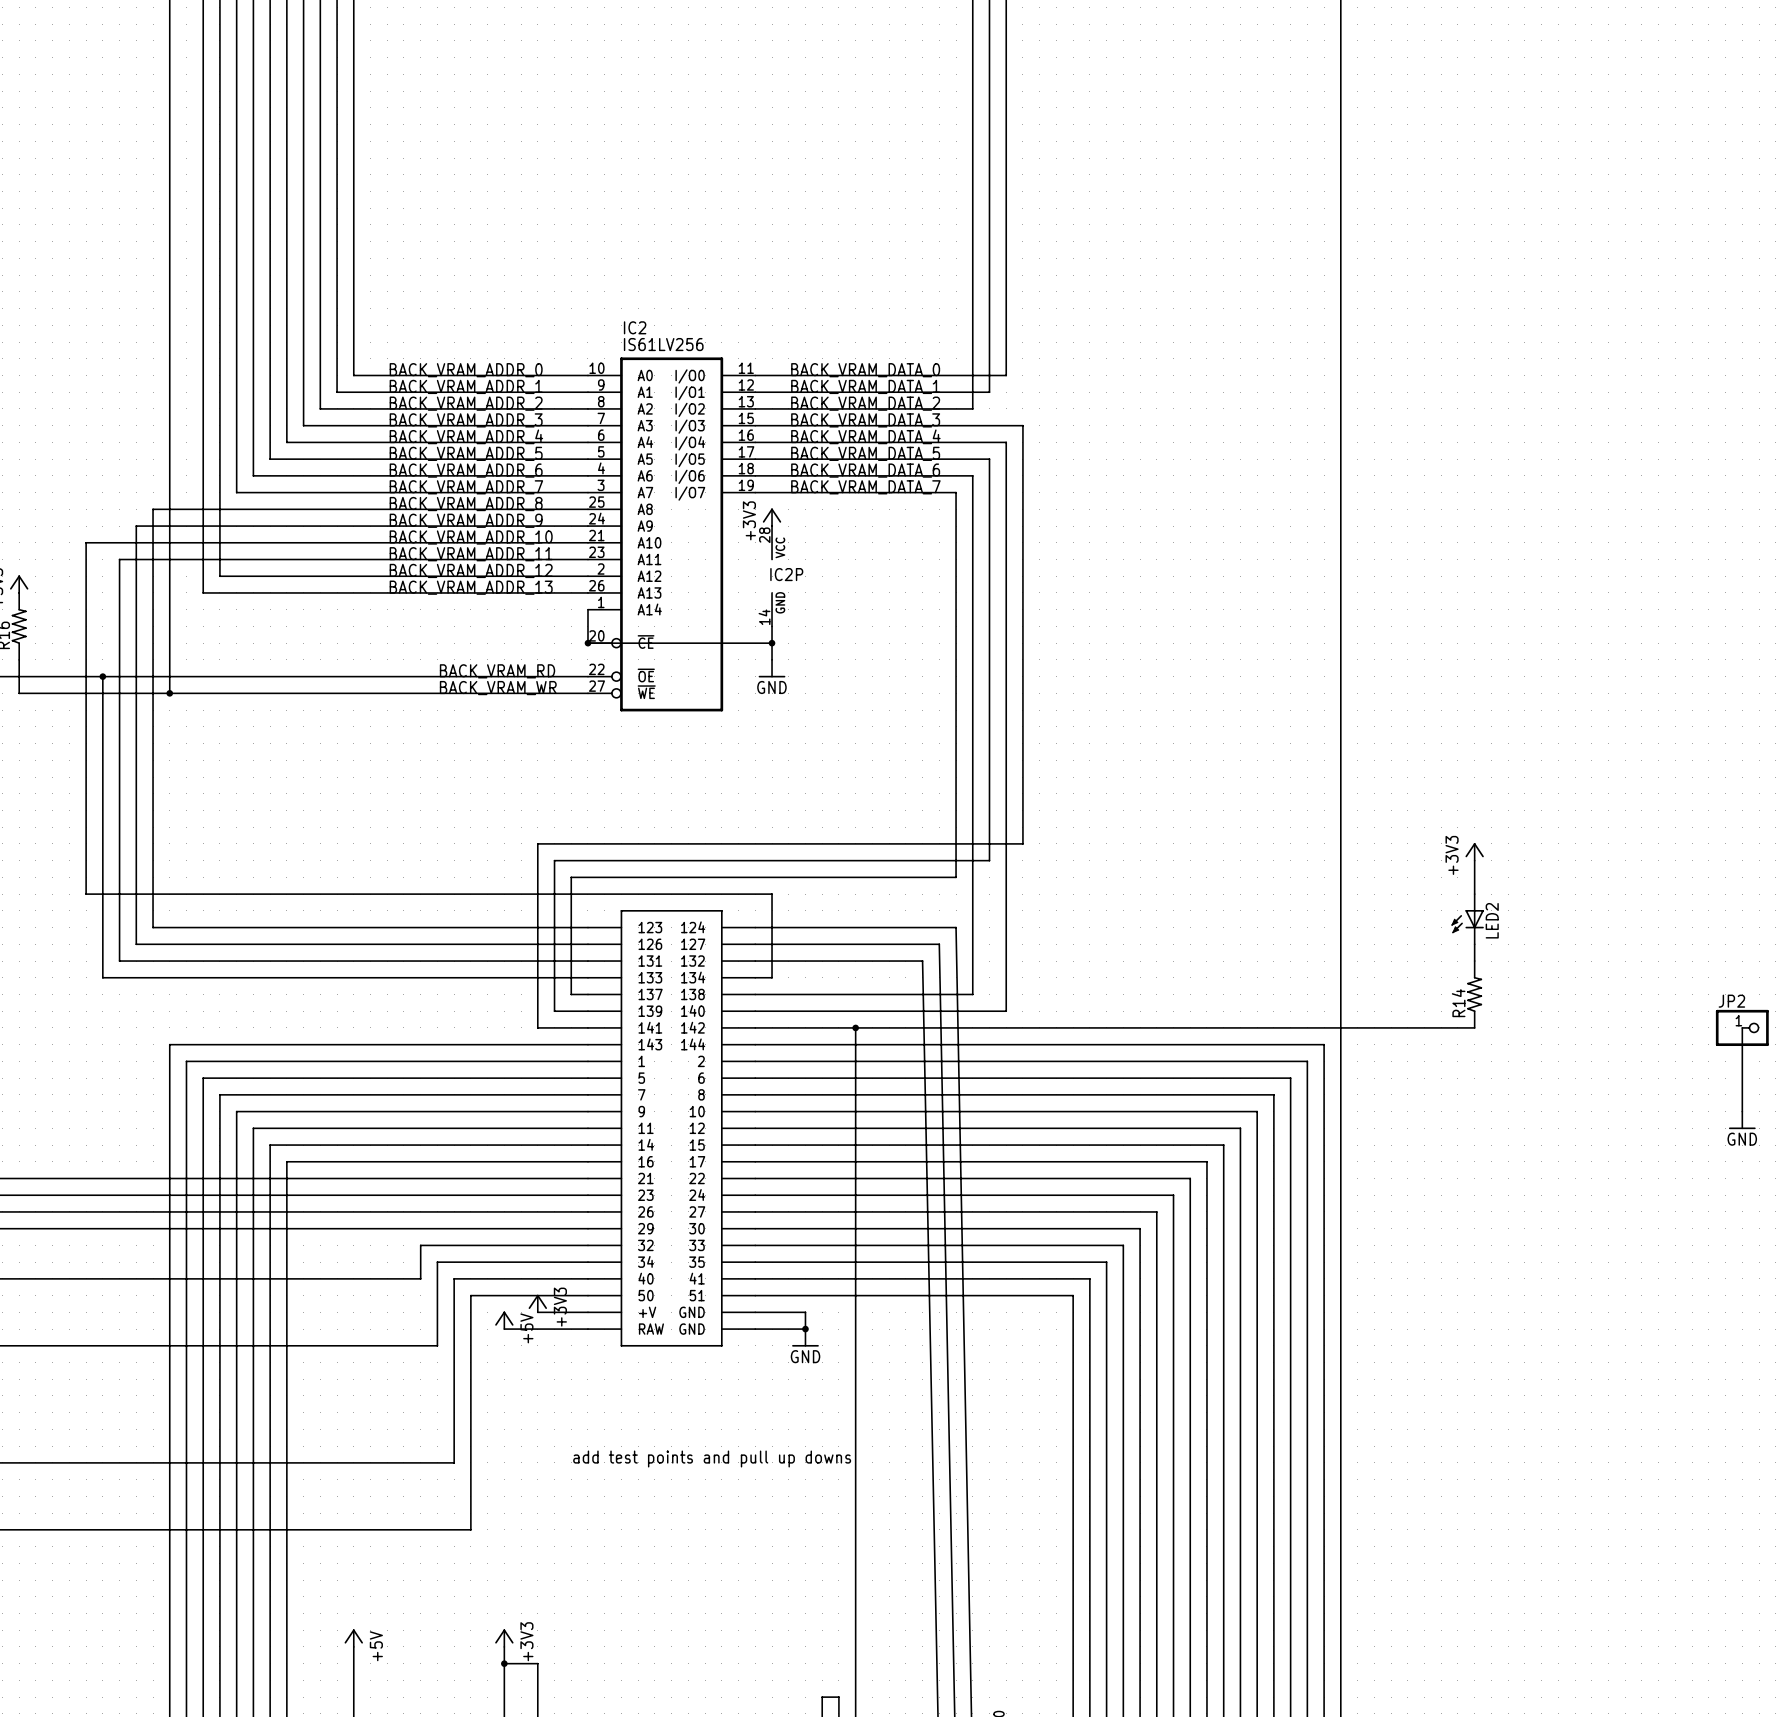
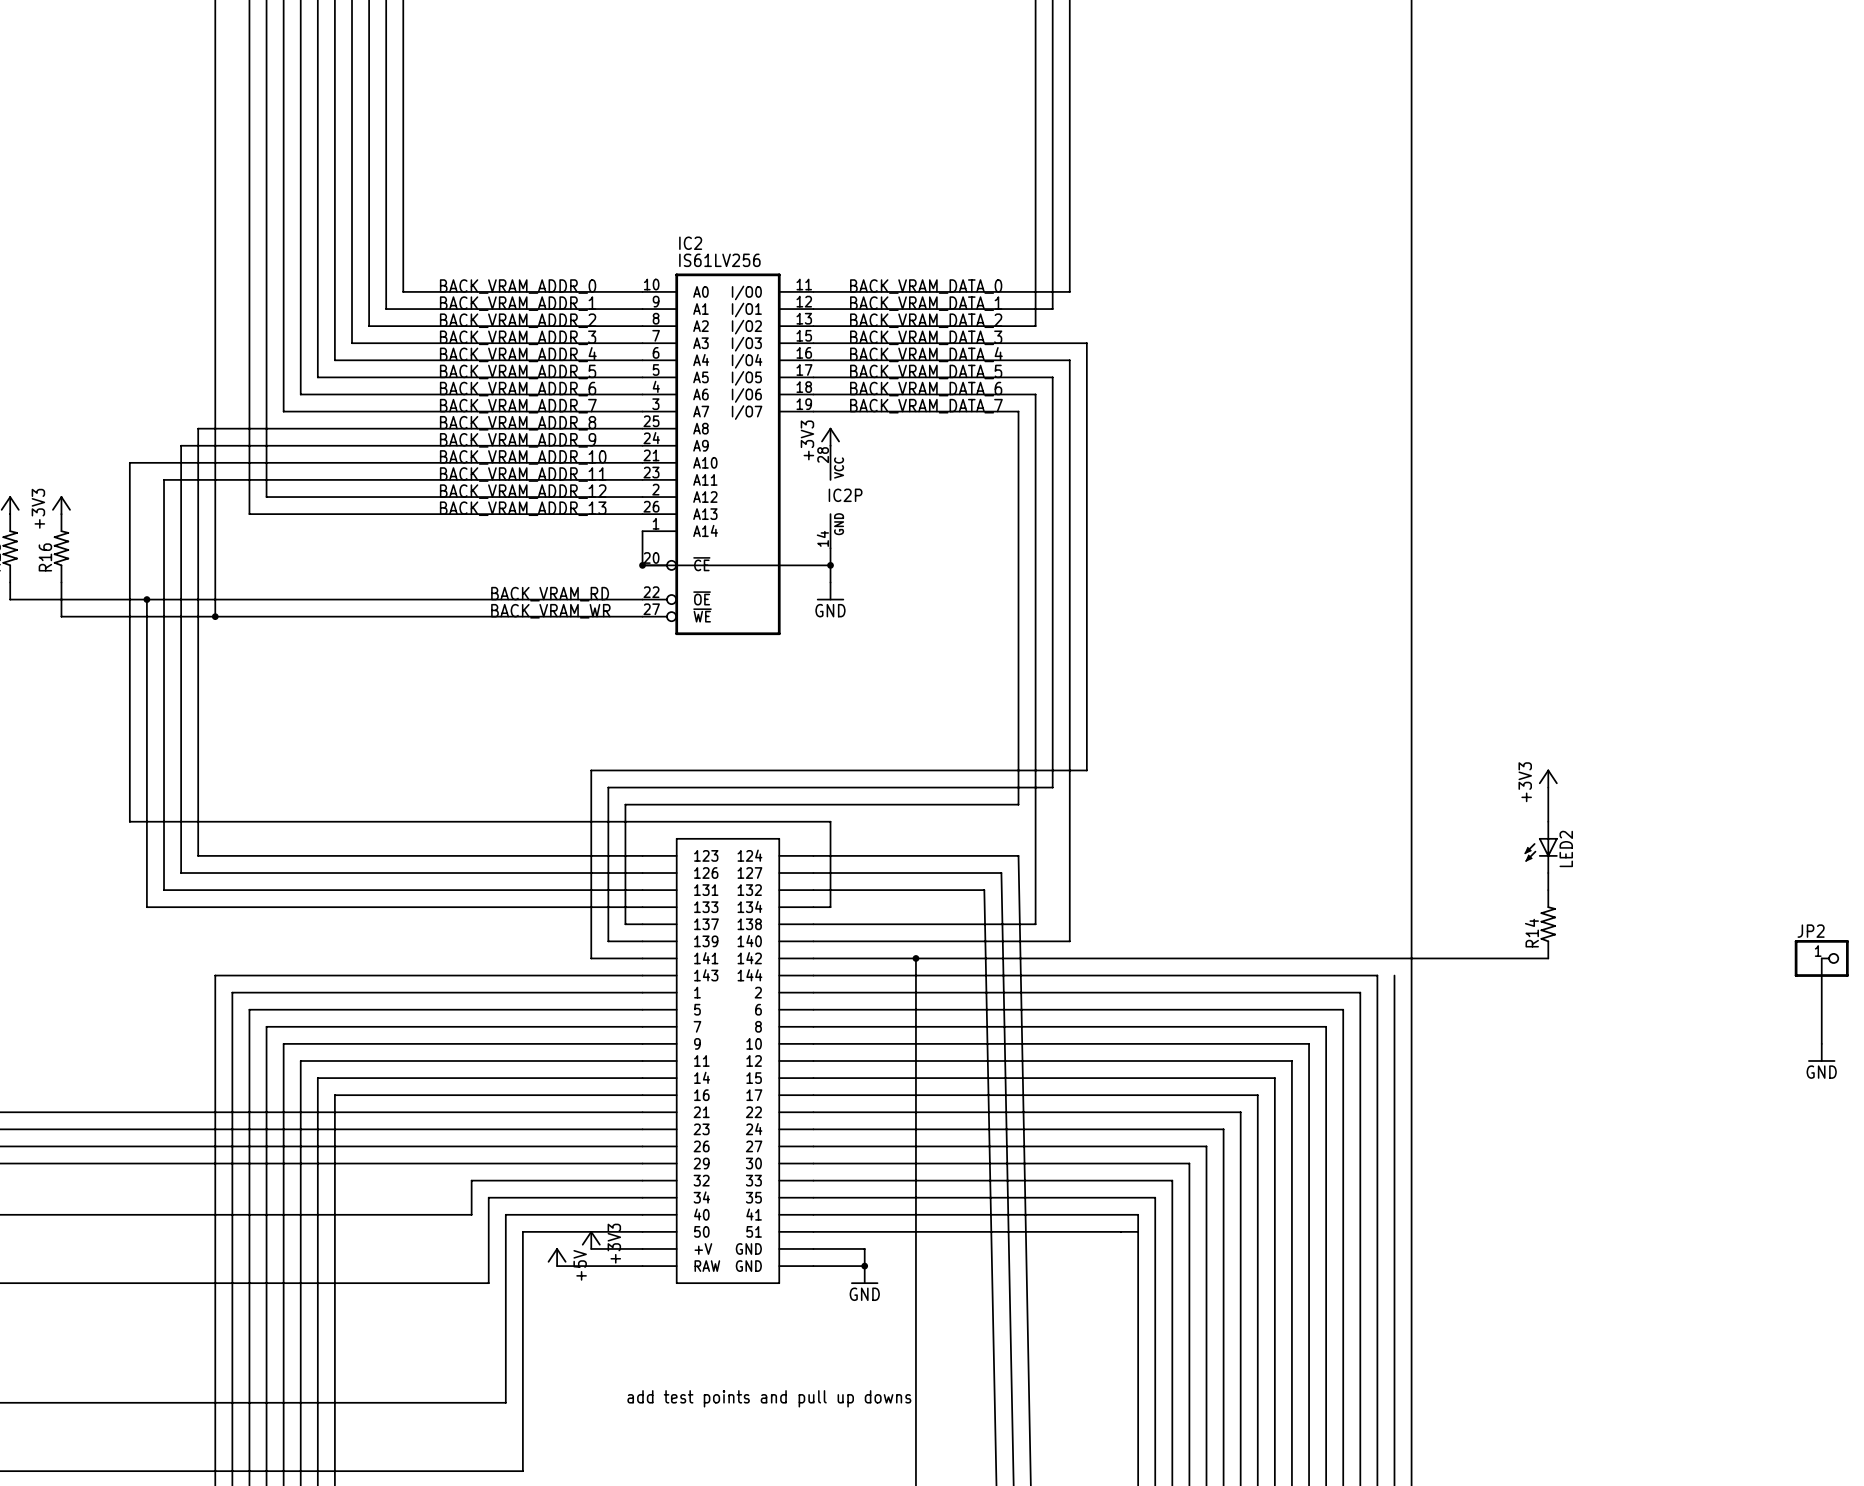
wire: (1307, 1044) (1324, 1044) -> none
wire: (1290, 1061) (1307, 1061) -> (1377, 975) (1377, 992)
wire: (1273, 1078) (1290, 1078) -> (1360, 992) (1360, 1009)
wire: none -> (1343, 1009) (1343, 1026)
wire: (1257, 1094) (1273, 1094) -> (1326, 1026) (1326, 1043)
wire: (1240, 1111) (1257, 1111) -> (1309, 1043) (1309, 1060)
wire: (1223, 1128) (1240, 1128) -> (1291, 1060) (1291, 1078)
wire: (1206, 1145) (1223, 1145) -> (1274, 1078) (1274, 1095)
wire: (1190, 1161) (1206, 1161) -> (1257, 1095) (1257, 1112)
wire: (1173, 1178) (1190, 1178) -> none
wire: (1156, 1195) (1173, 1195) -> (1240, 1112) (1240, 1129)
wire: none -> (1223, 1129) (1223, 1146)
wire: (1140, 1211) (1156, 1211) -> (1206, 1146) (1206, 1163)
wire: (1123, 1228) (1140, 1228) -> none
wire: (1106, 1245) (1123, 1245) -> (1189, 1163) (1189, 1180)
wire: (1089, 1262) (1106, 1262) -> (1172, 1180) (1172, 1197)
wire: none -> (1155, 1197) (1155, 1214)
wire: (1073, 1278) (1089, 1278) -> (1138, 1214) (1138, 1231)

